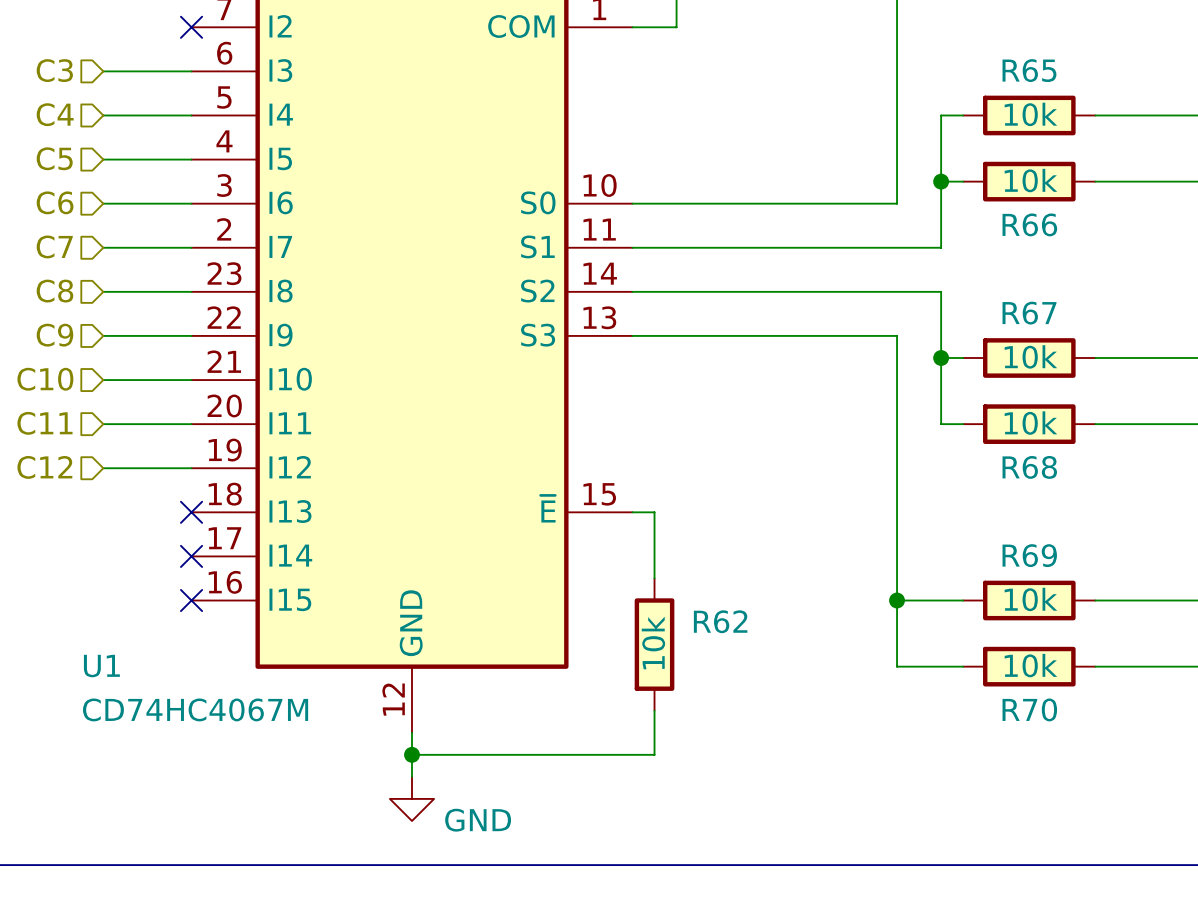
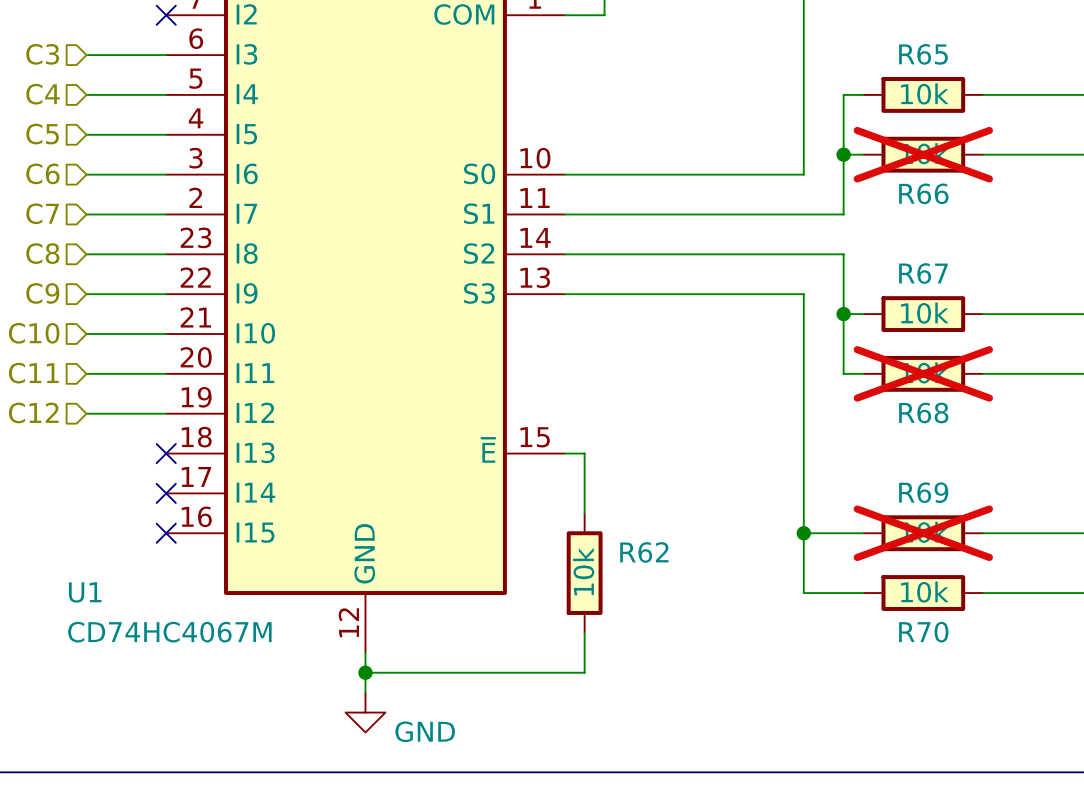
R66 do-not-place cross: none -> (923, 154)
R68 do-not-place cross: none -> (923, 373)
R69 do-not-place cross: none -> (923, 533)

